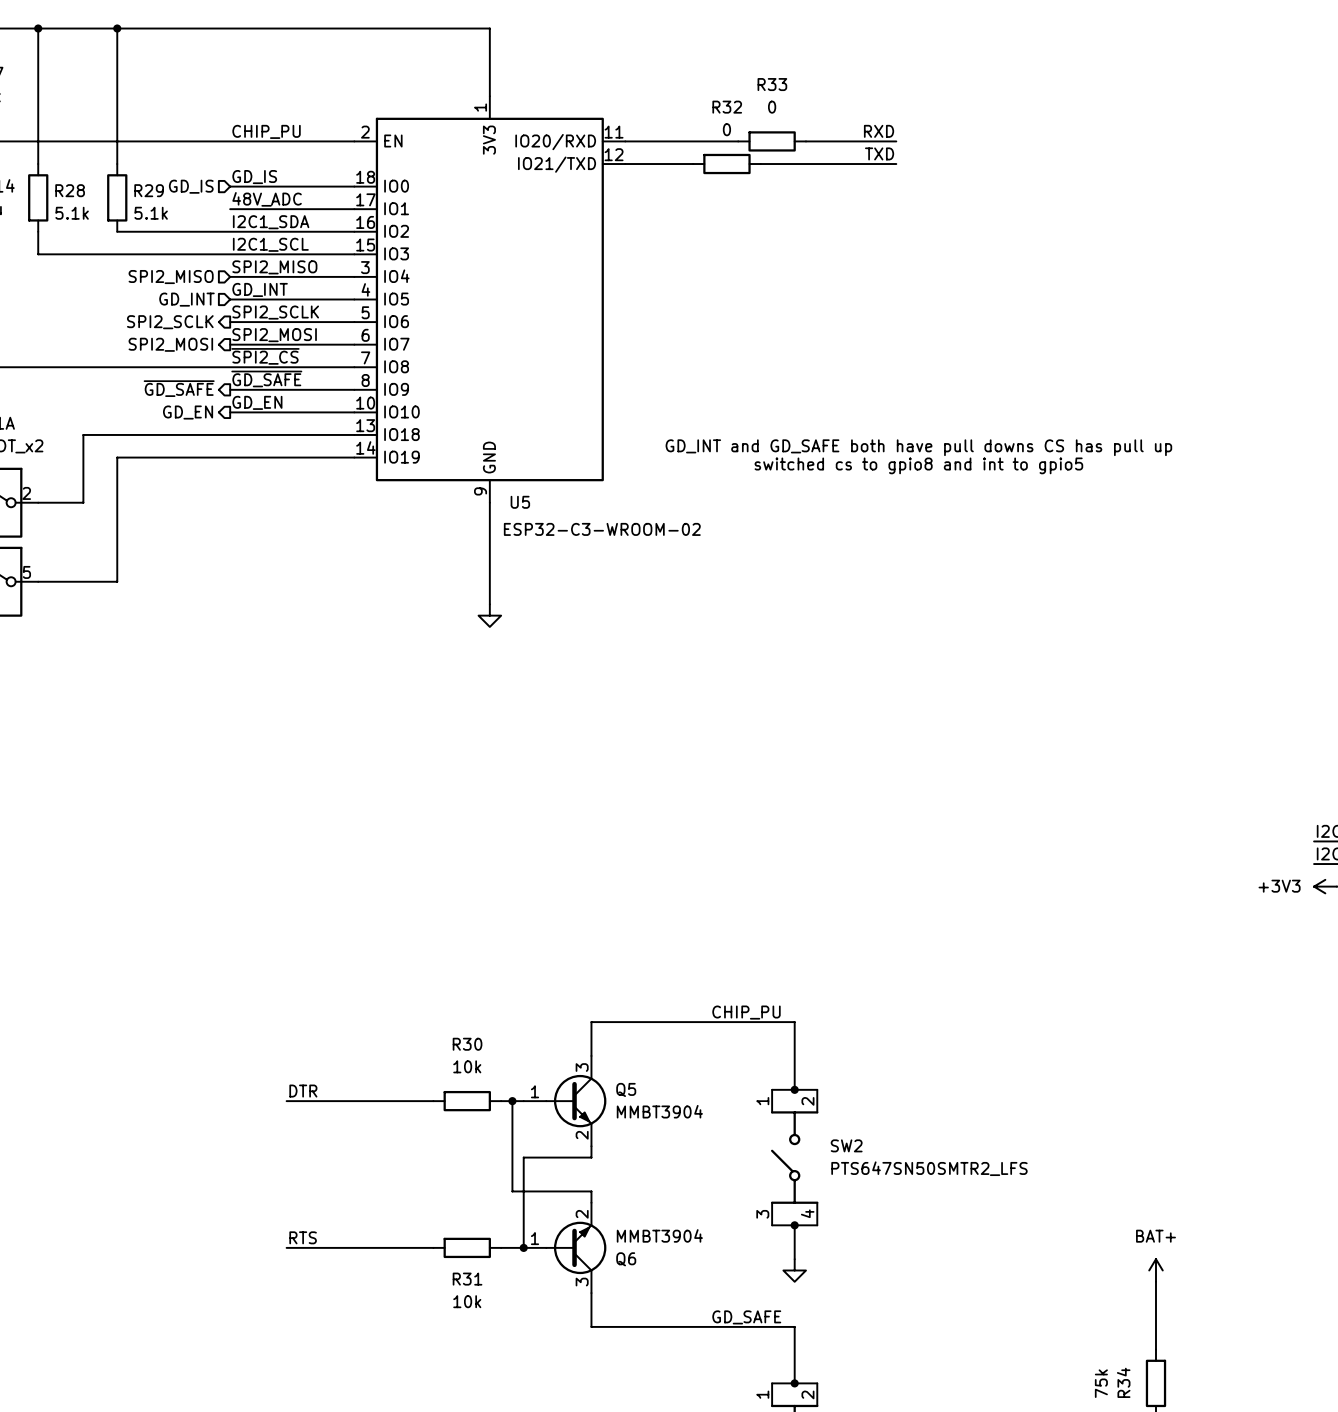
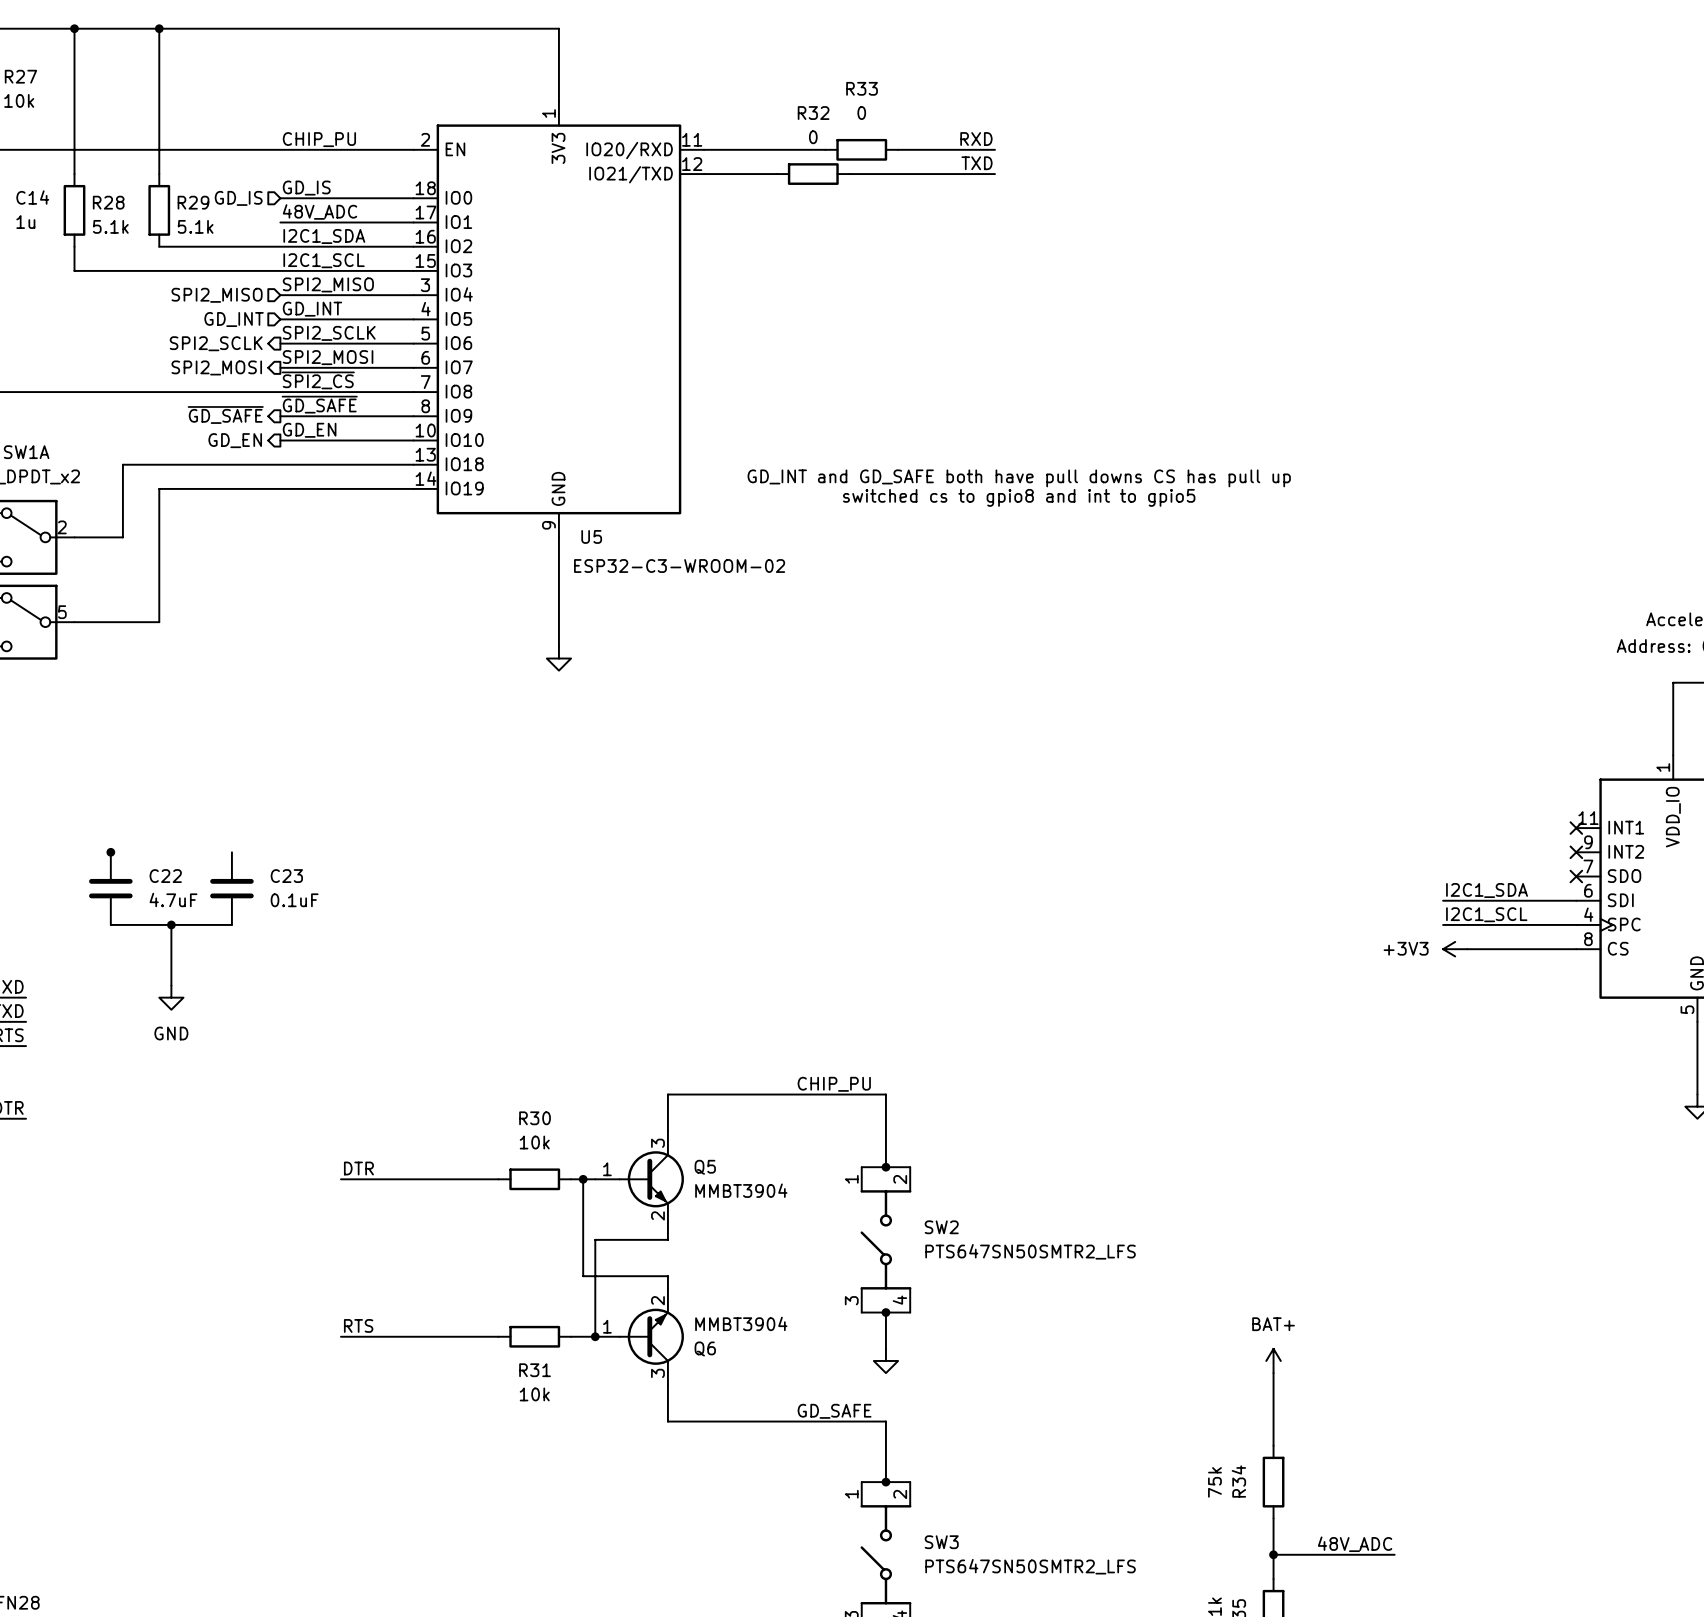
junction: none -> (110, 852)
C22: none -> 4.7uF (110, 888)
C23: none -> 0.1uF (231, 888)
wire: none -> (110, 924) (231, 924)
wire: none -> (171, 924) (171, 985)
junction: none -> (171, 924)
power symbol: none -> GND (171, 997)

